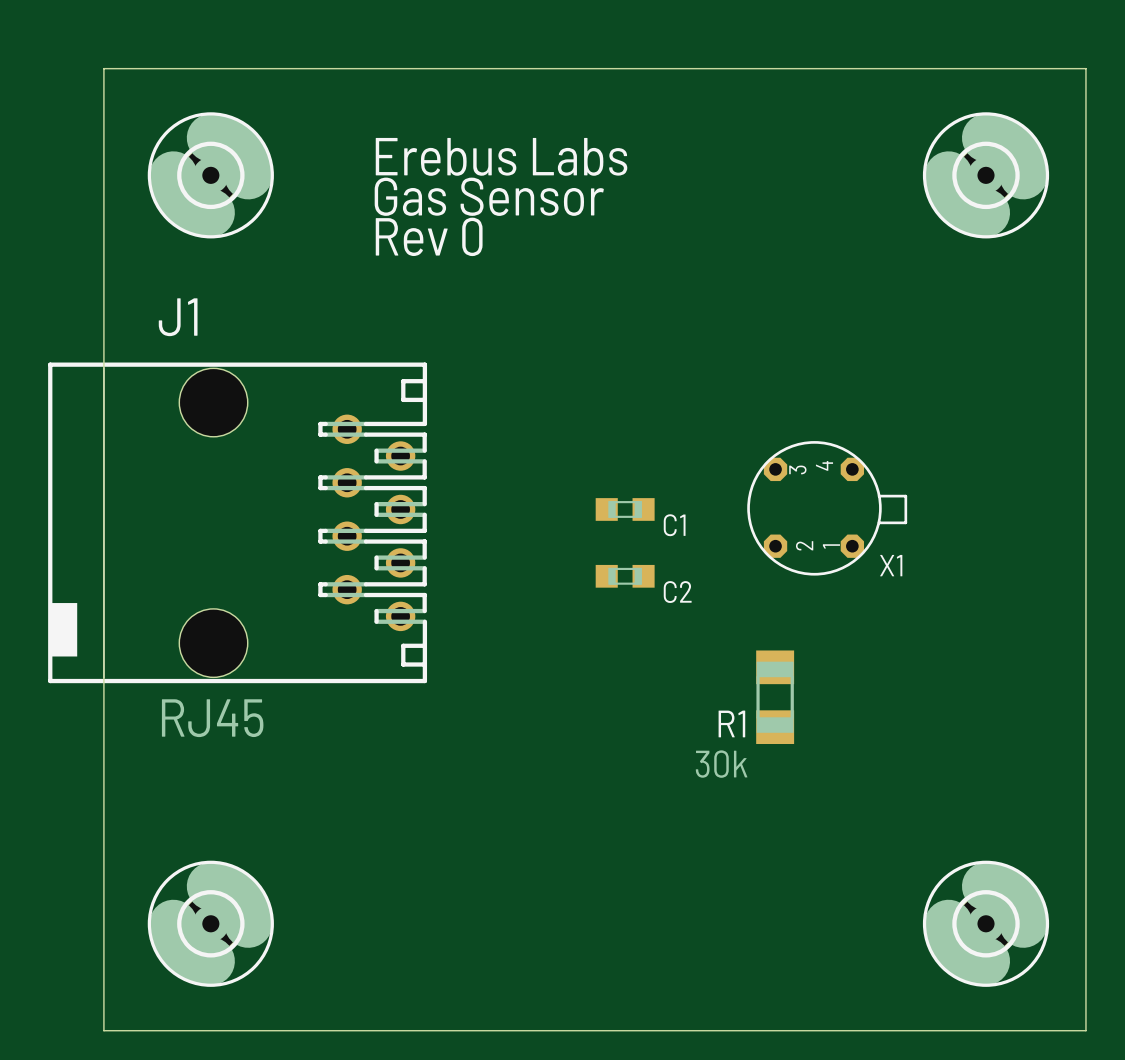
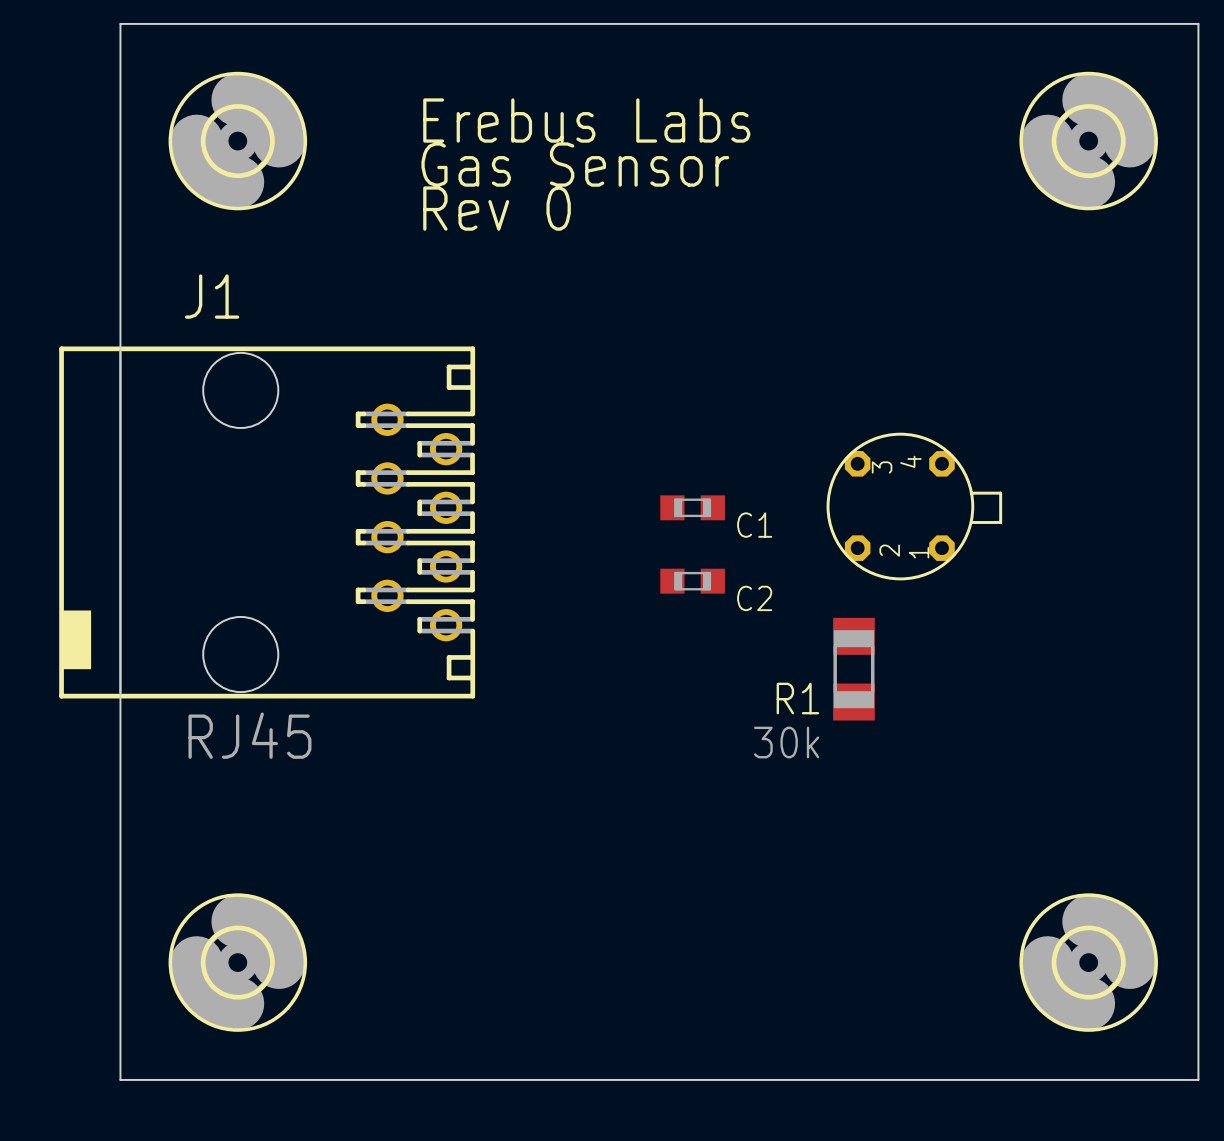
text: X1 (891, 565) -> none
R1 position: (775, 697) -> (853, 669)

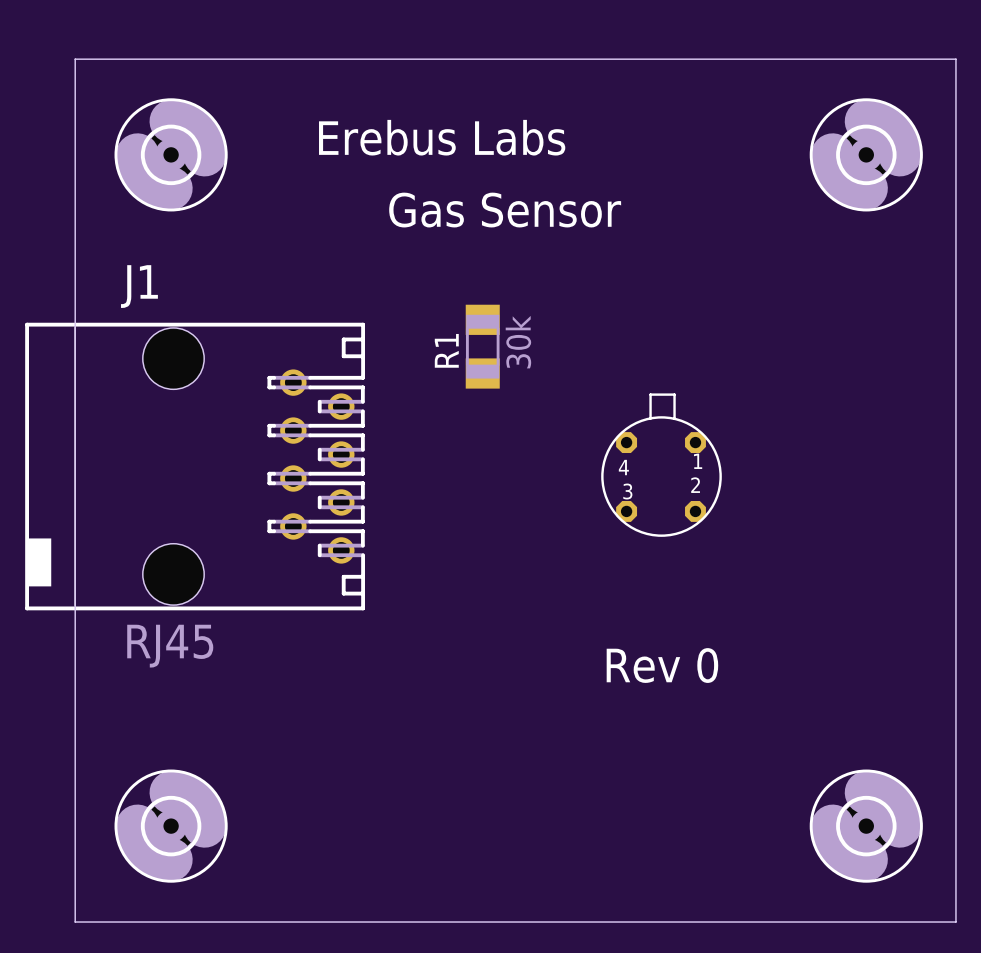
text position: Gas Sensor (575, 164) -> Gas Sensor (505, 210)
text: Rev 0 (497, 208) -> none
part: (914, 506) -> none
C1: (692, 507) -> none
part: none -> (661, 465)
C2: (692, 581) -> none
R1 position: (853, 669) -> (482, 346)
R1 name rotation: 0° (797, 698) -> 90° counterclockwise (446, 350)
R1 value rotation: 0° (786, 742) -> 90° counterclockwise (518, 342)
R1 value position: 30k (786, 742) -> 30k (518, 342)
text: none -> Rev 0 (662, 665)

